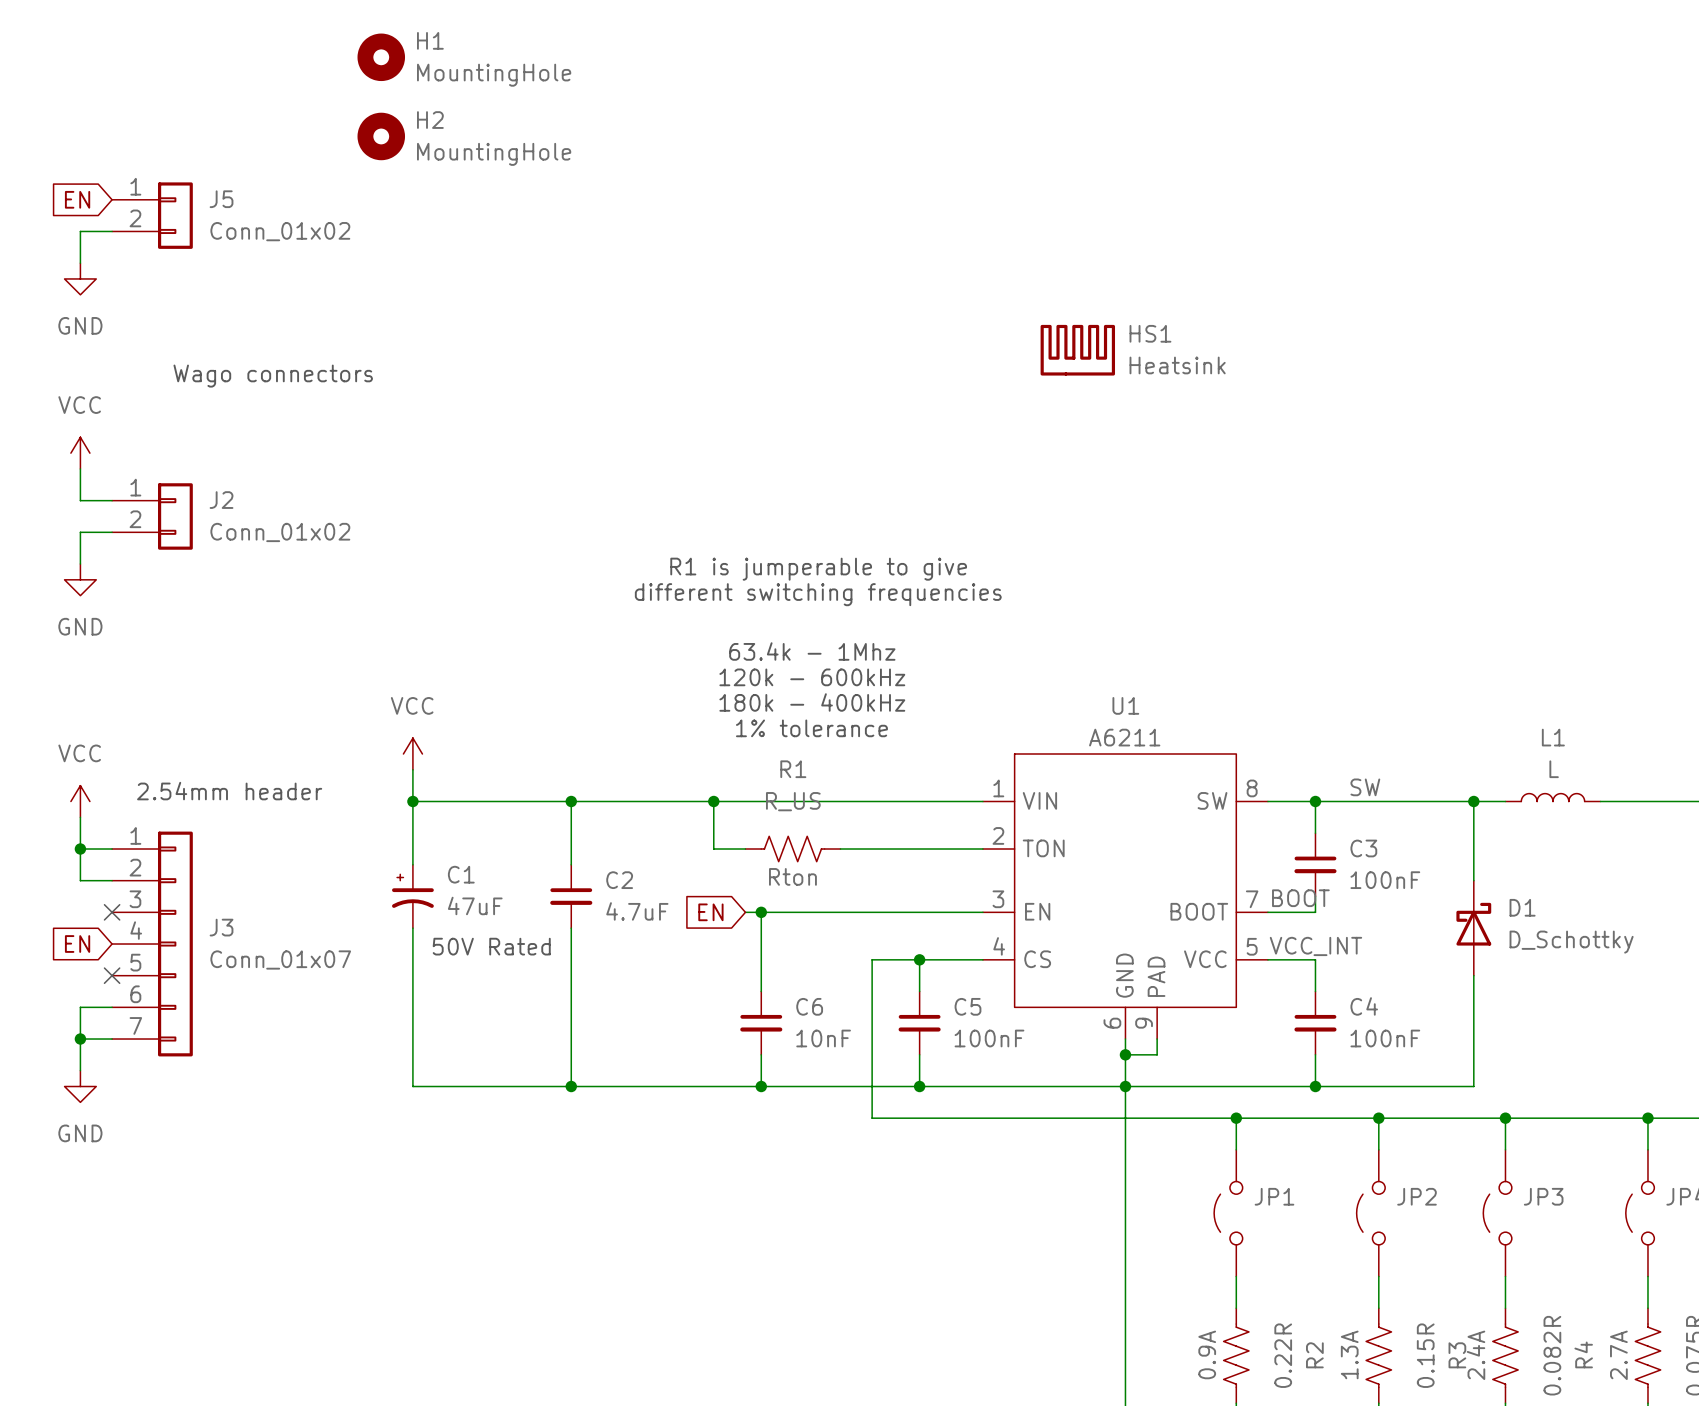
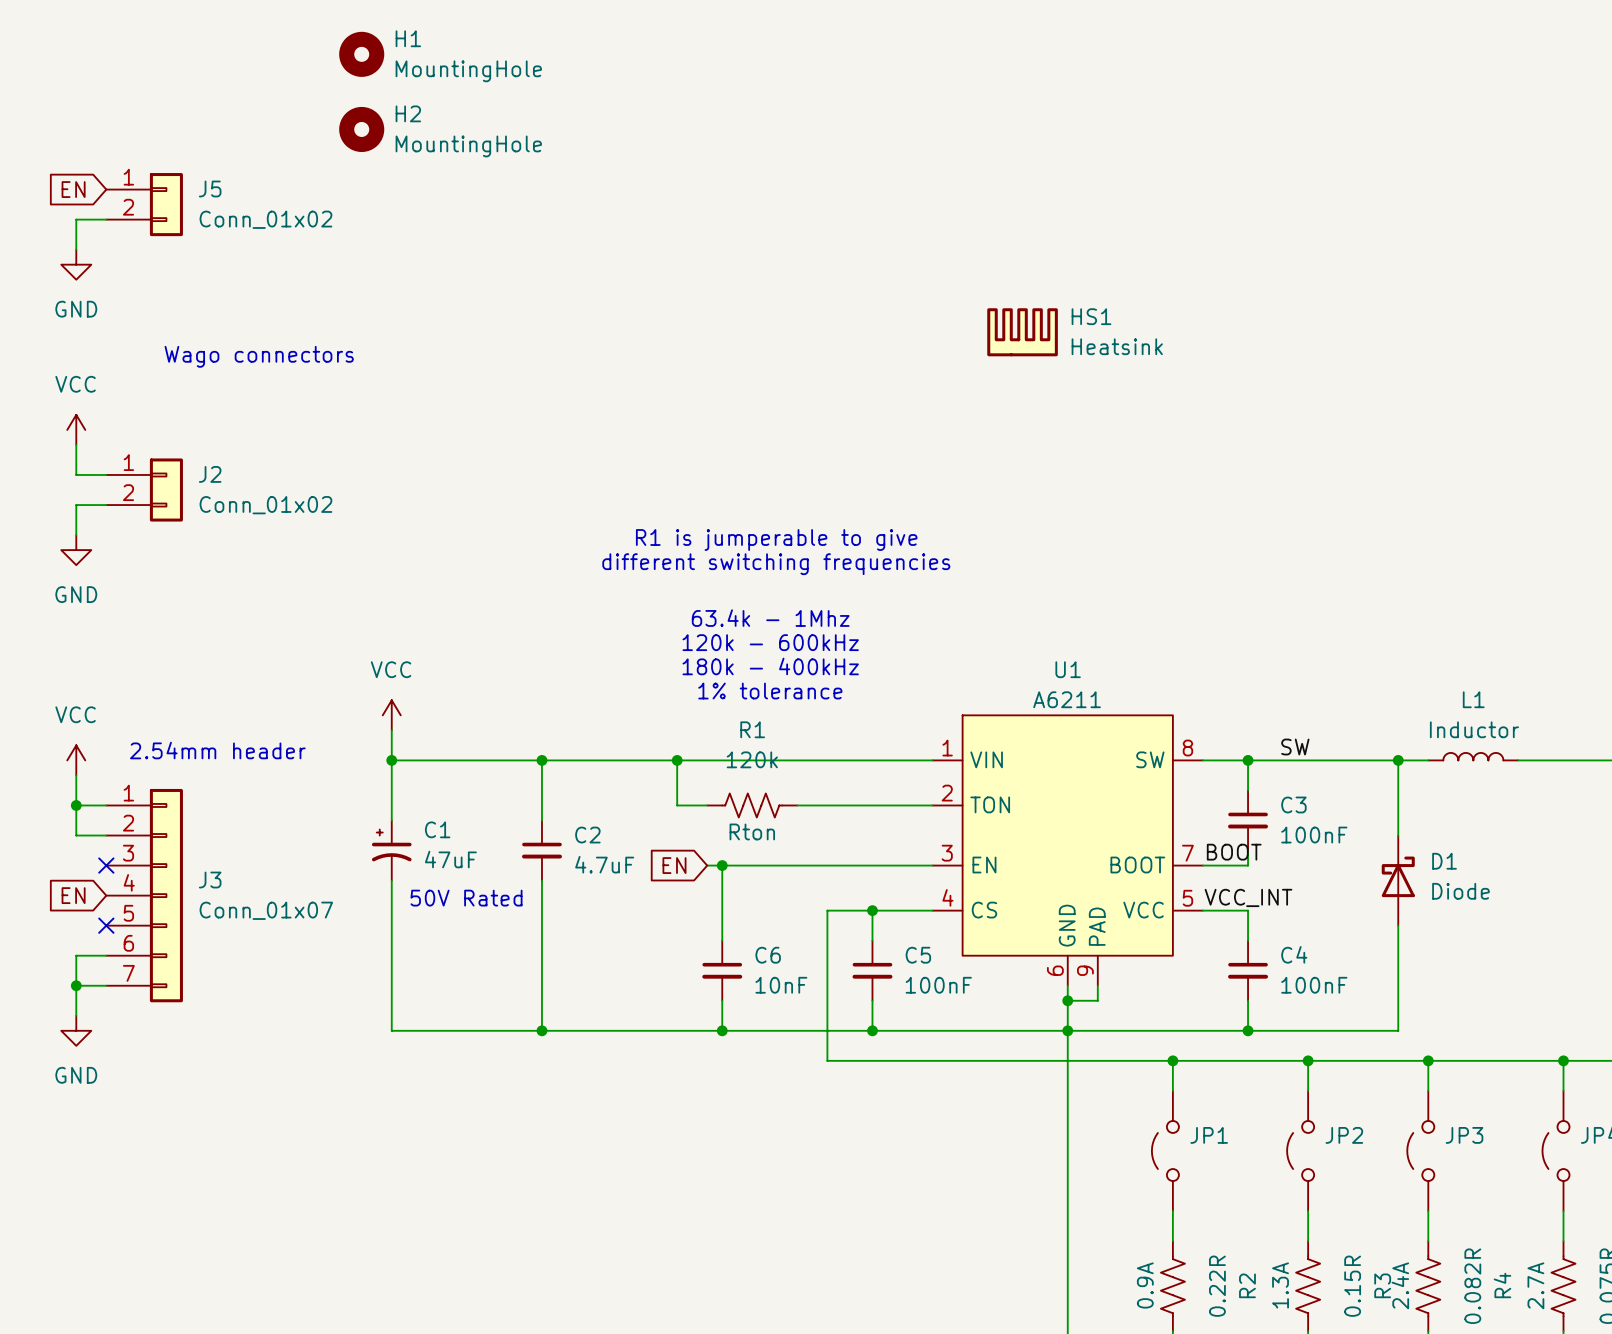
L1 value: L (1554, 769) -> Inductor (1474, 729)
R1 value: R_US (793, 801) -> 120k (752, 759)
D1 value: D_Schottky (1571, 942) -> Diode (1460, 891)

